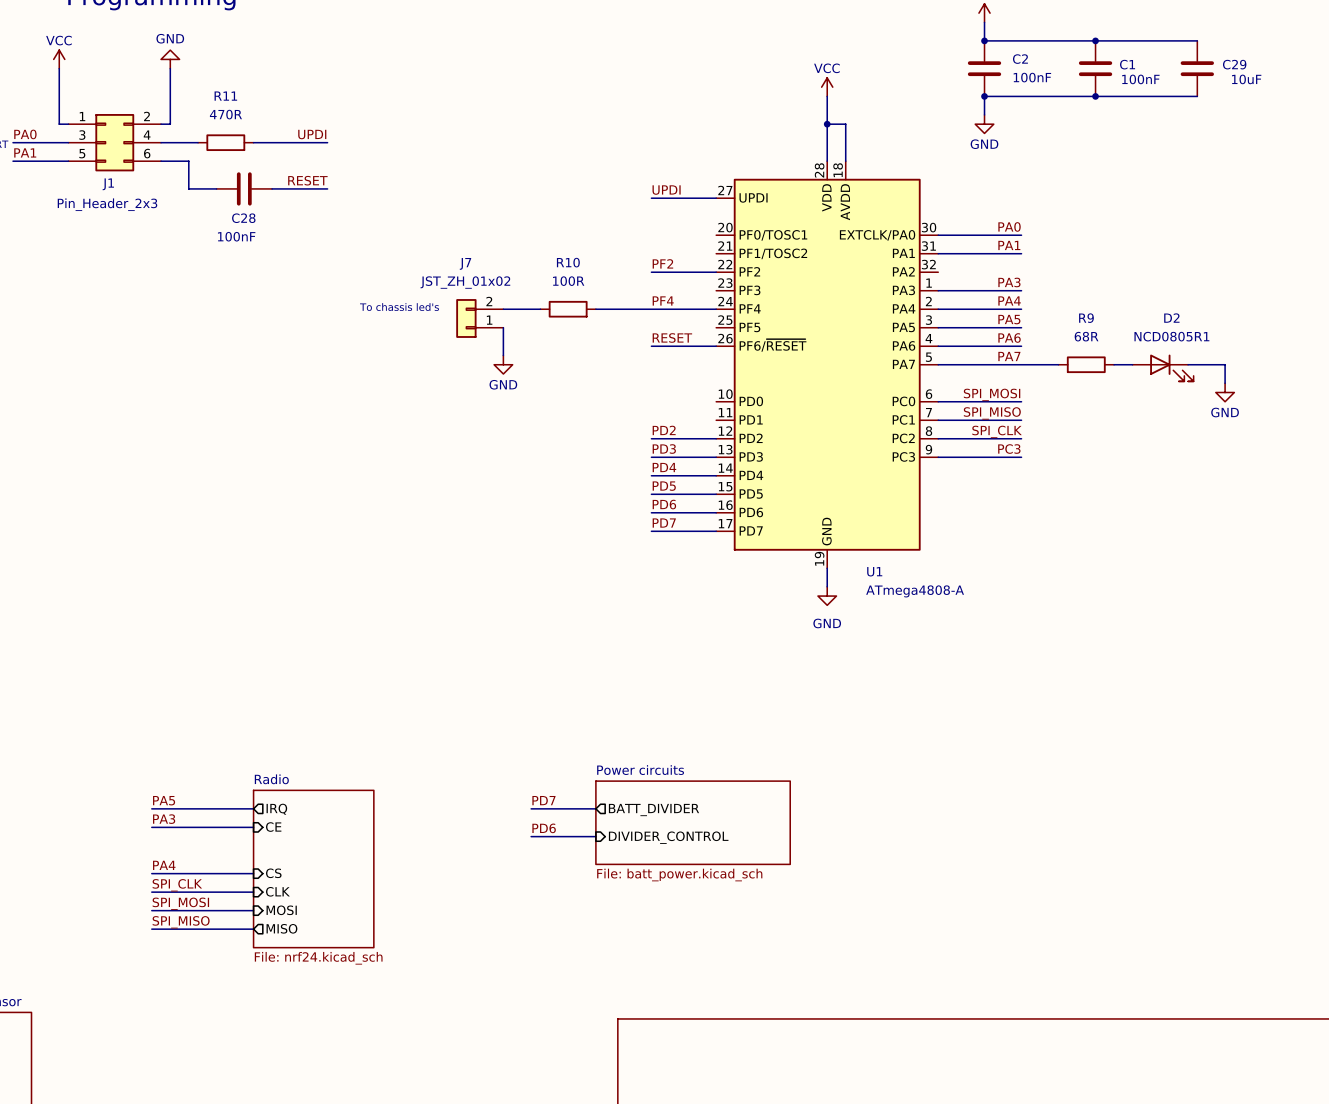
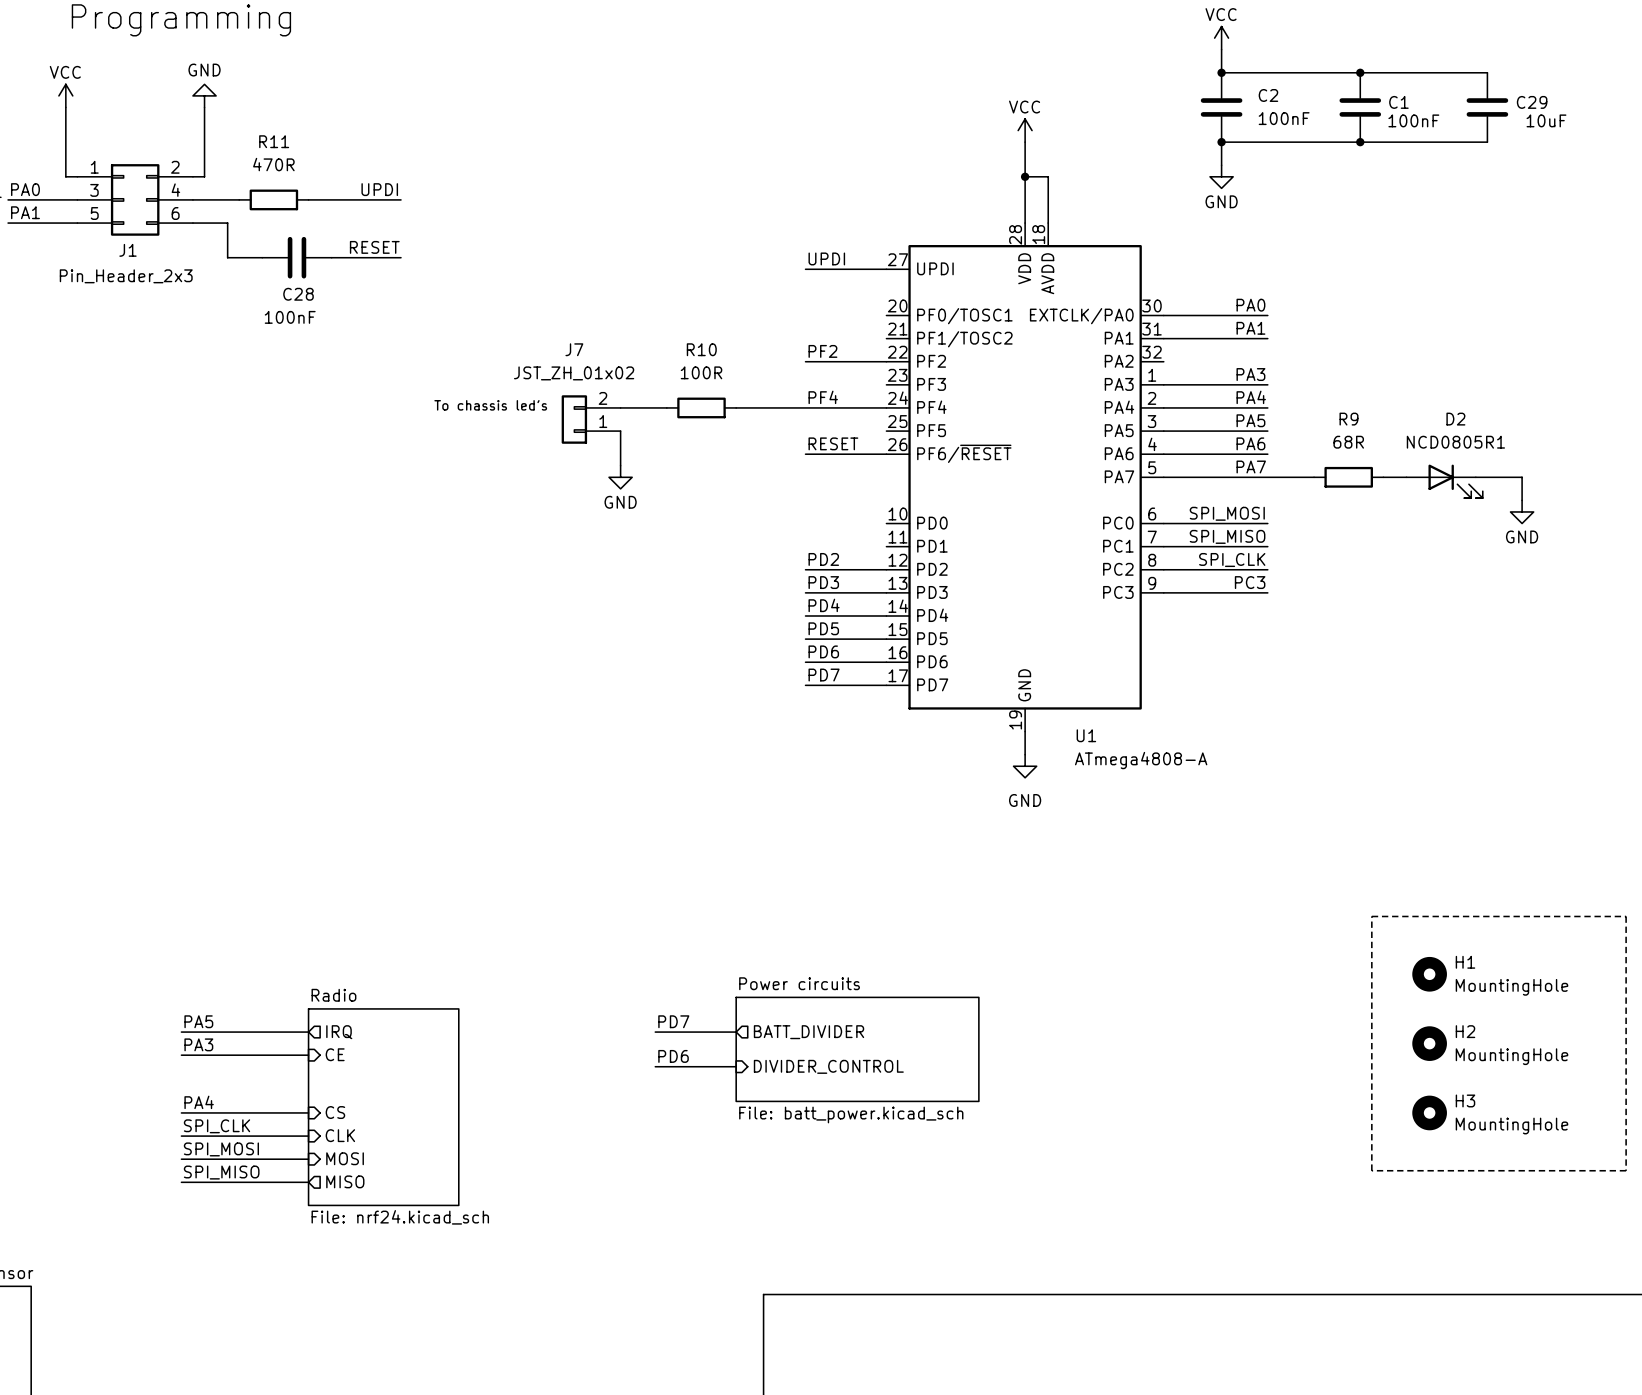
line: none -> (1371, 916) (1626, 916) (1626, 1170) (1371, 1170) (1371, 916)
H1: none -> MountingHole (1429, 974)
H2: none -> MountingHole (1429, 1043)
H3: none -> MountingHole (1429, 1112)

